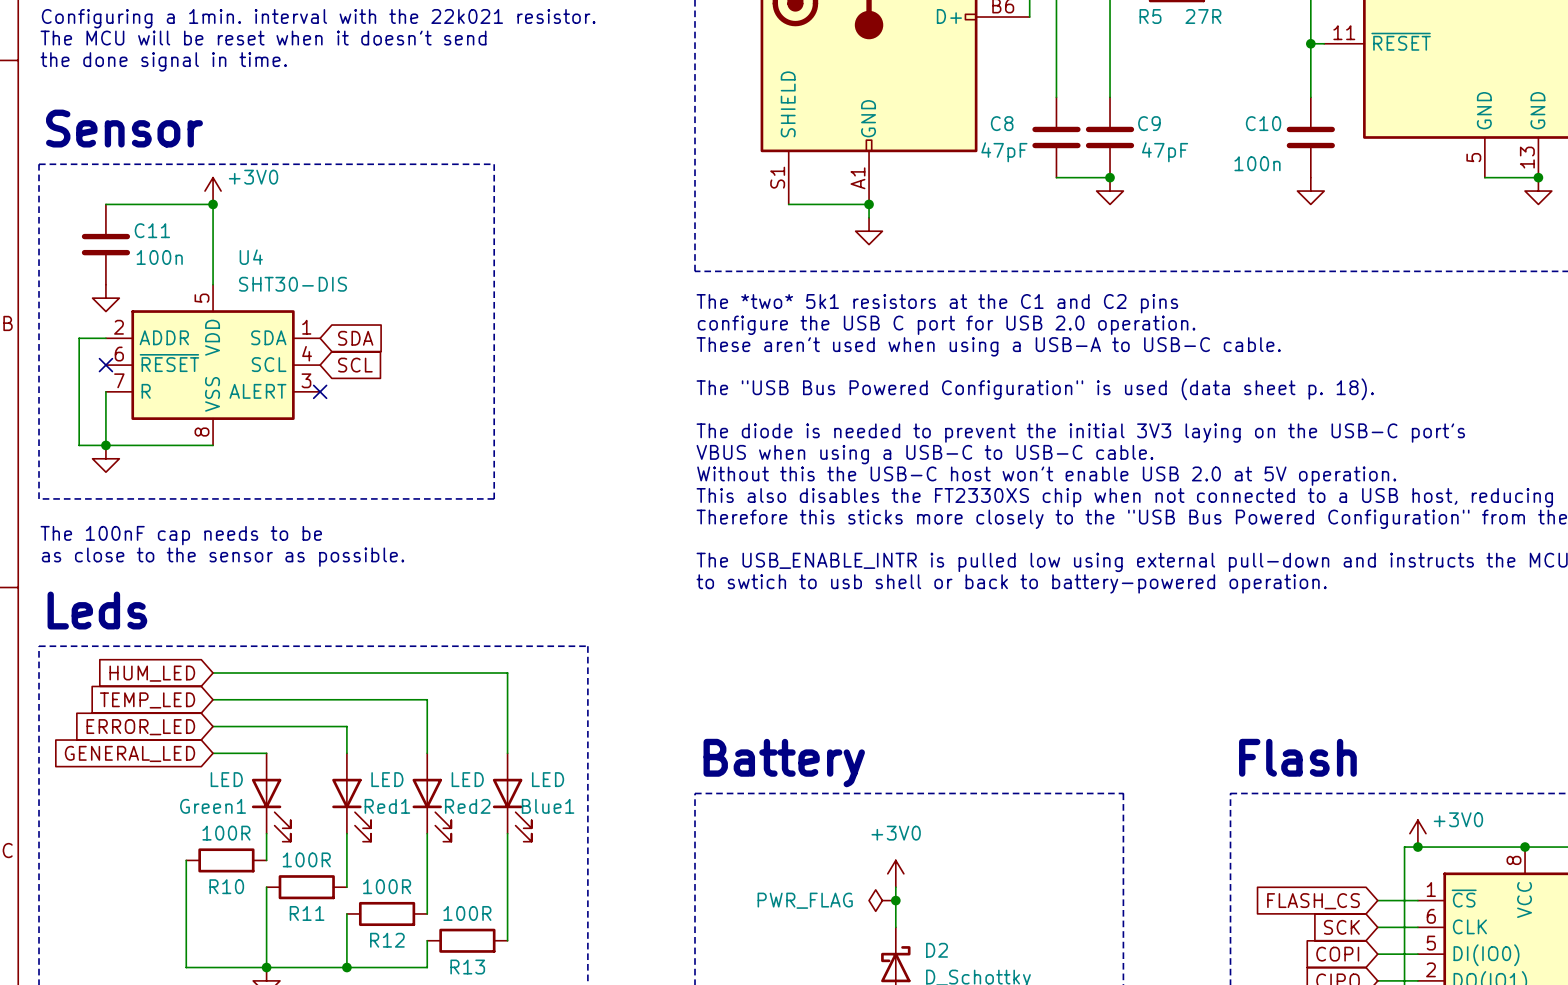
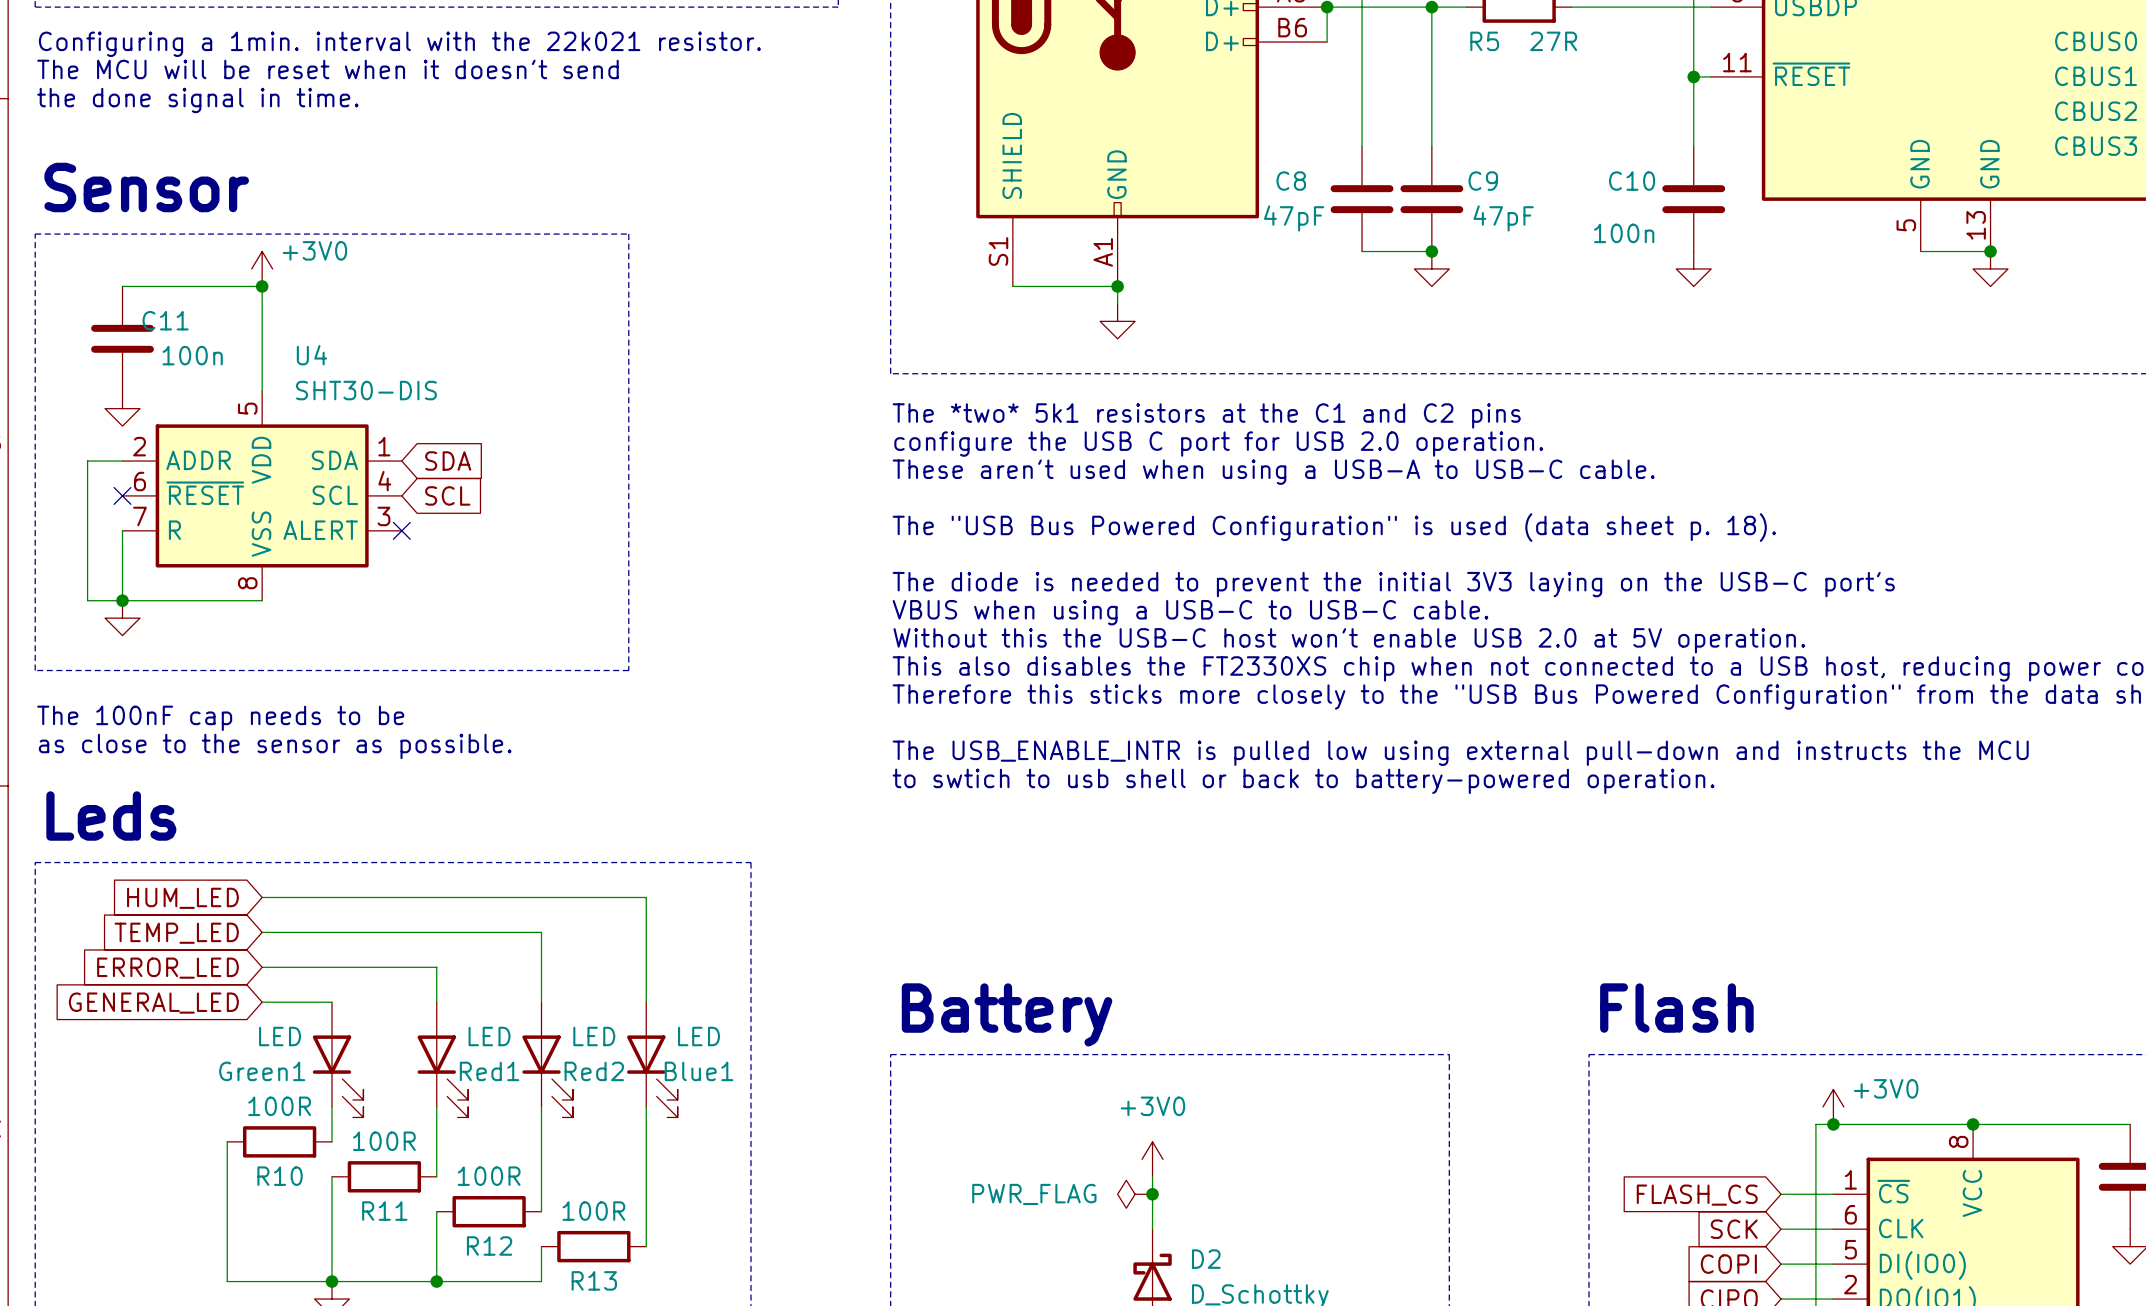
C11 name position: C11 (152, 230) -> C11 (165, 320)

